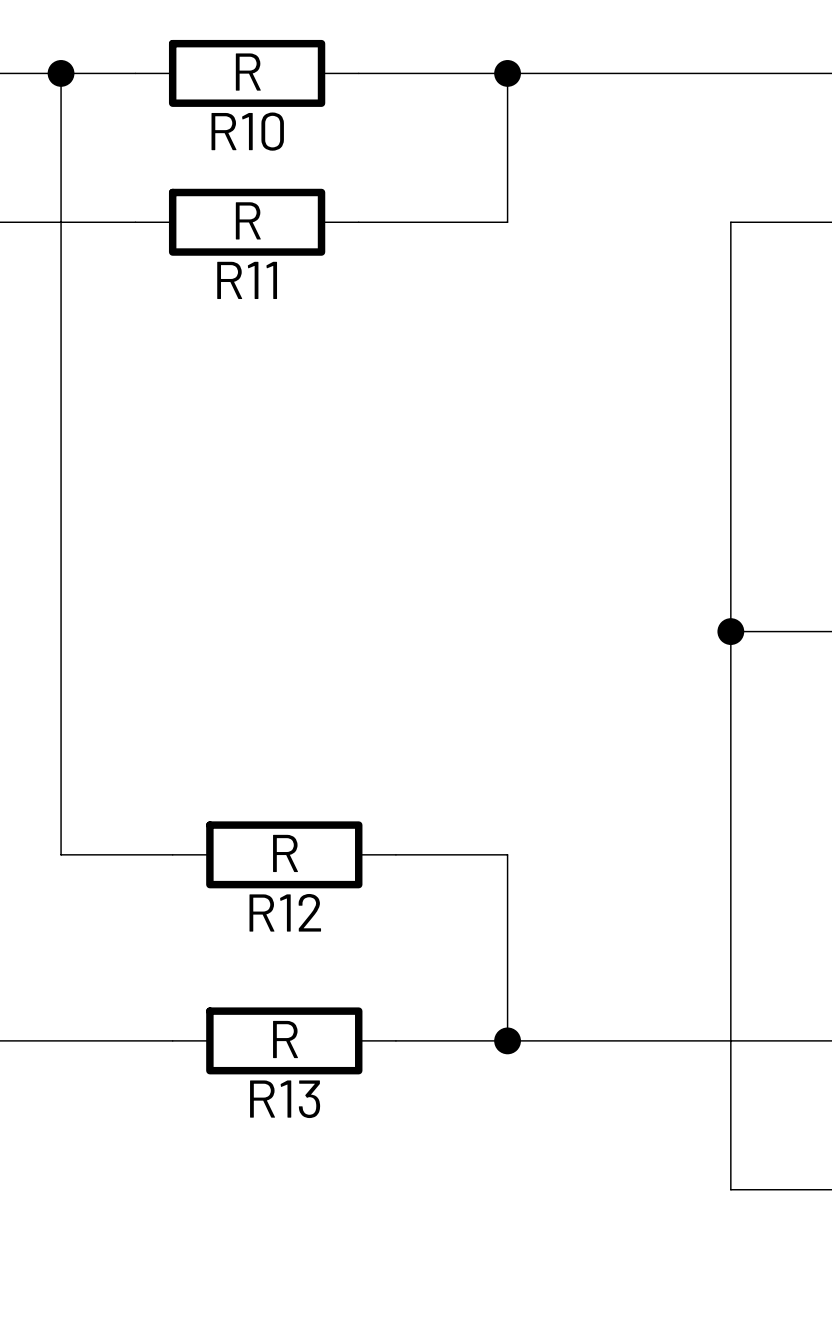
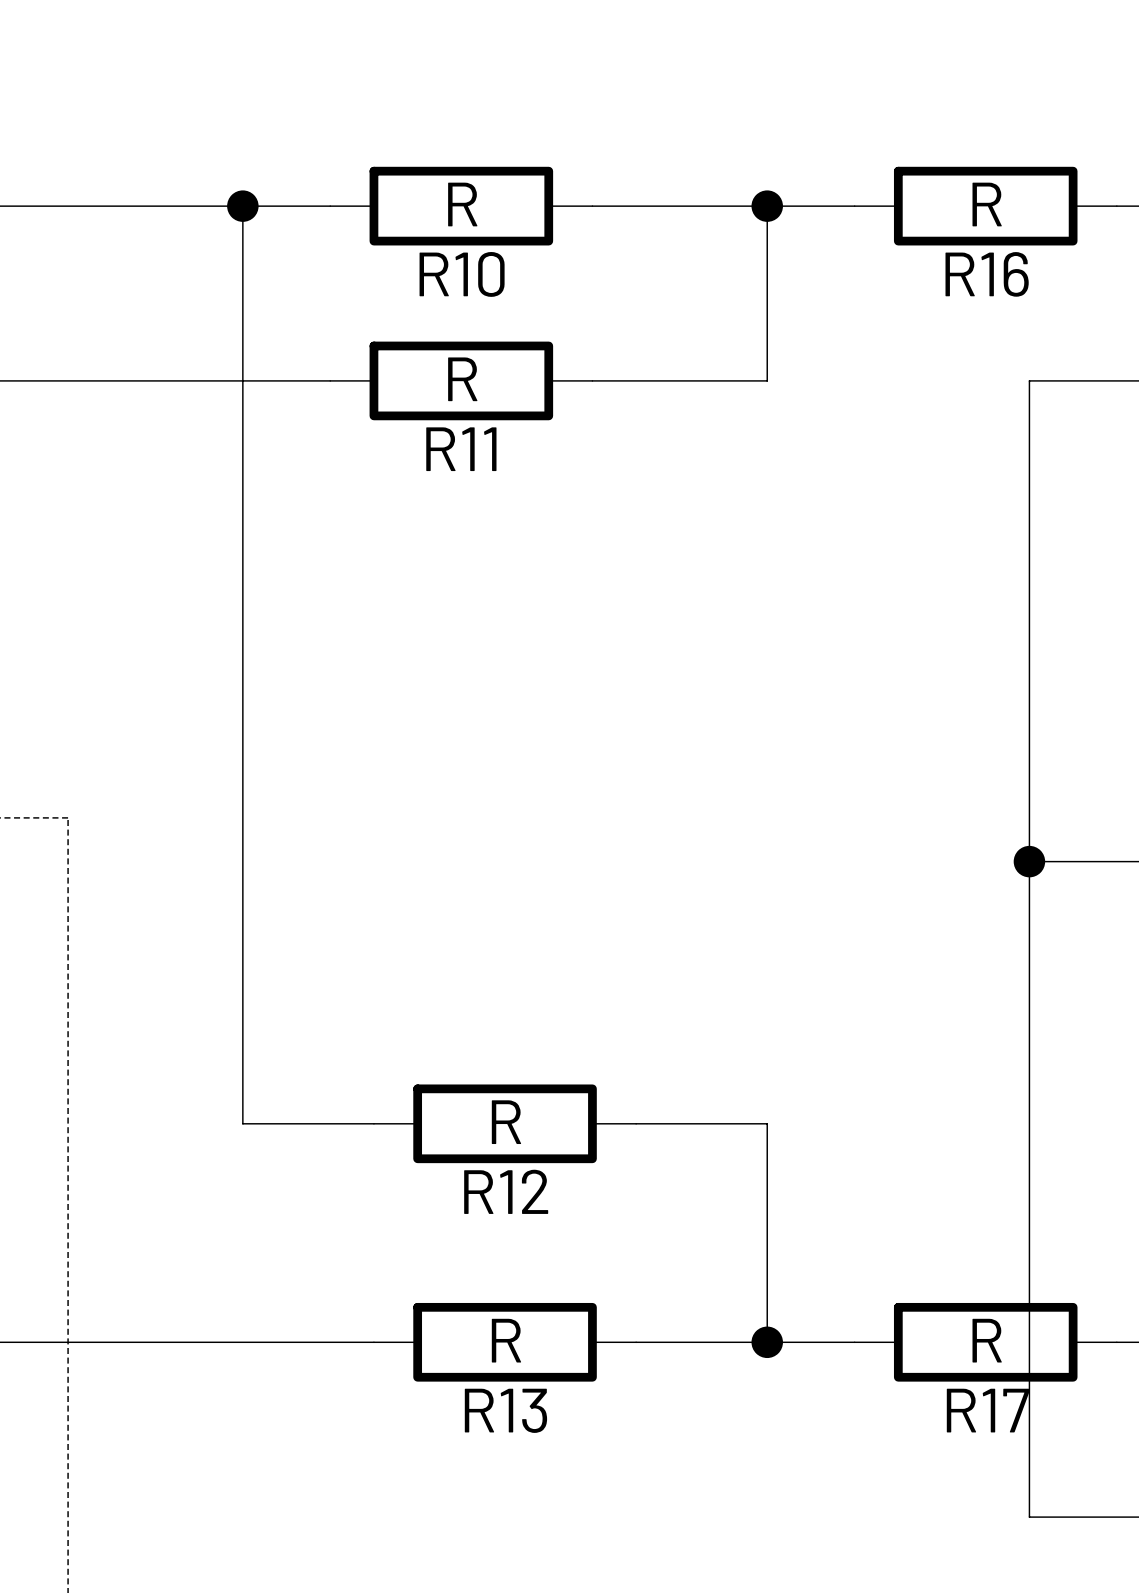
wire: (581, 73) (805, 73) -> none
R16: none -> R (985, 206)
wire: (581, 1040) (805, 1040) -> none
R17: none -> R (985, 1342)

